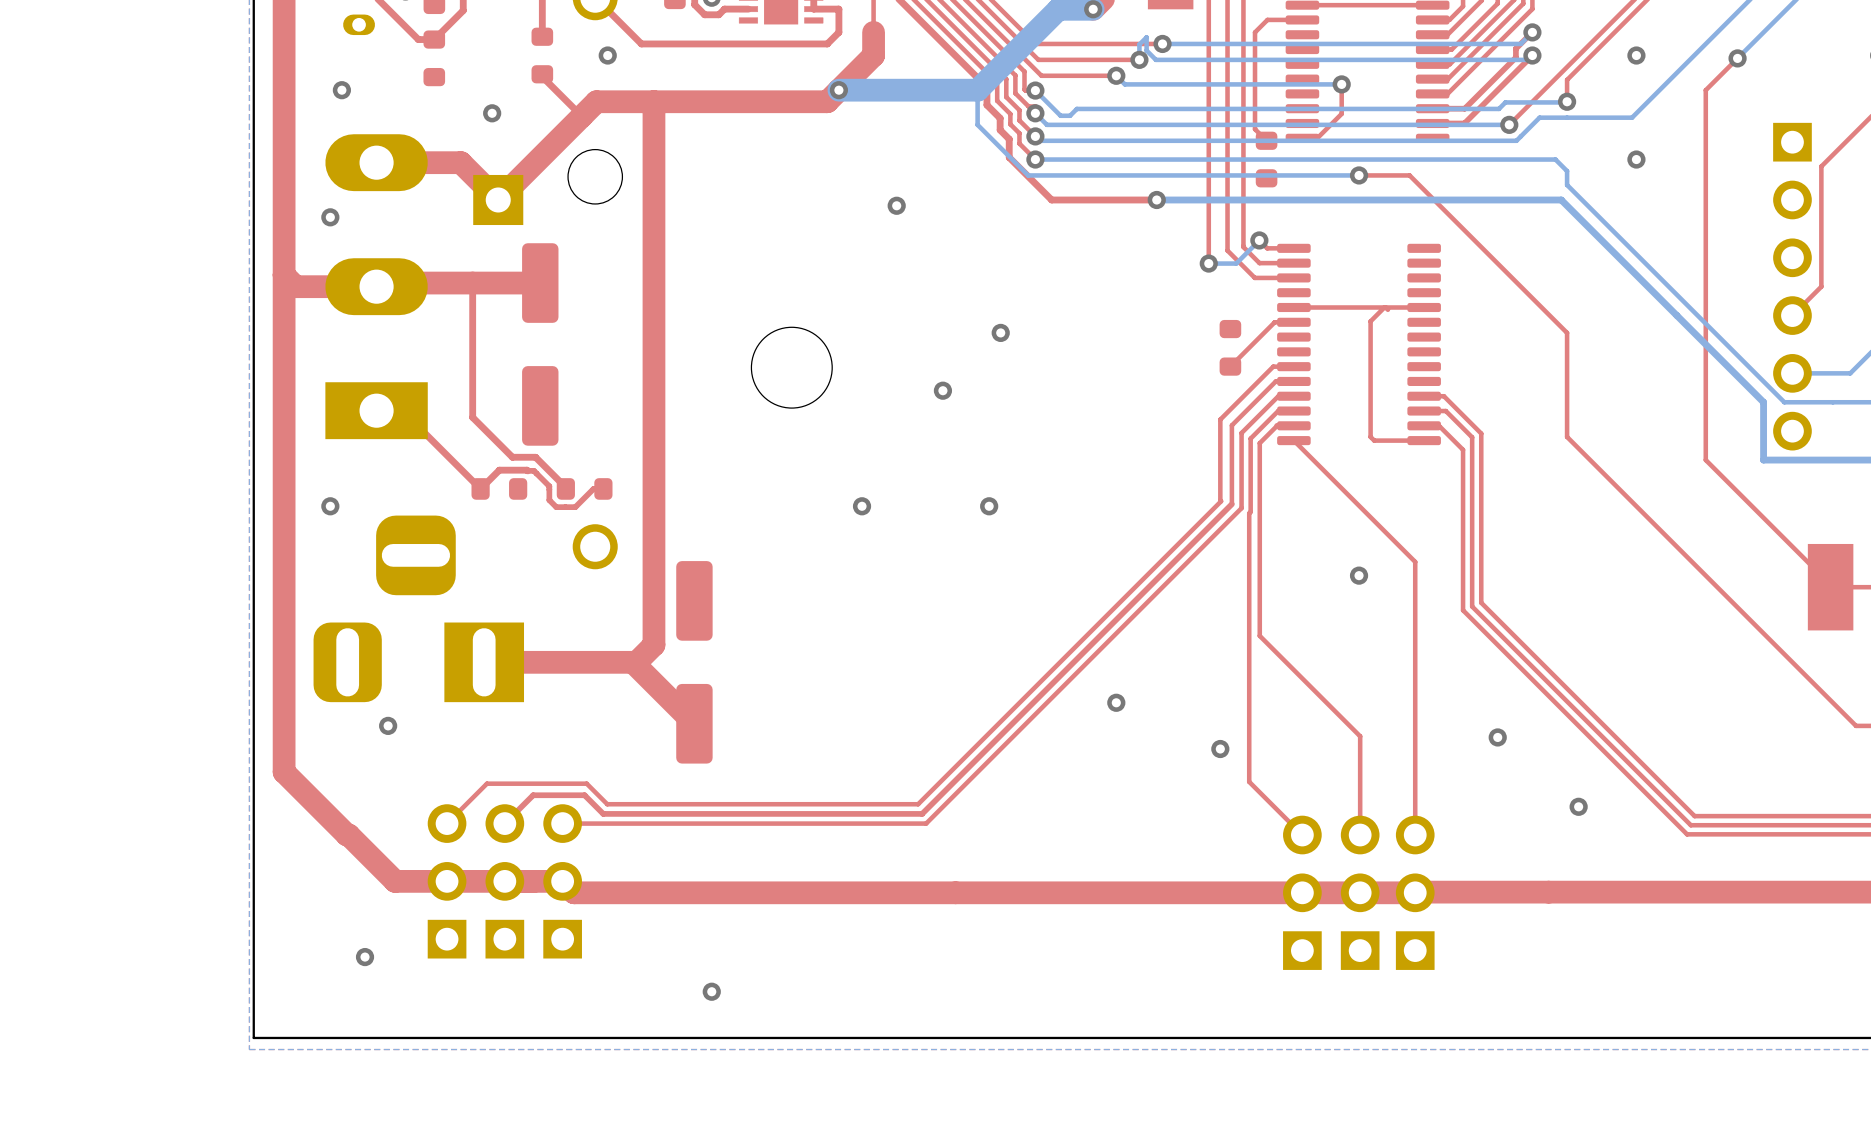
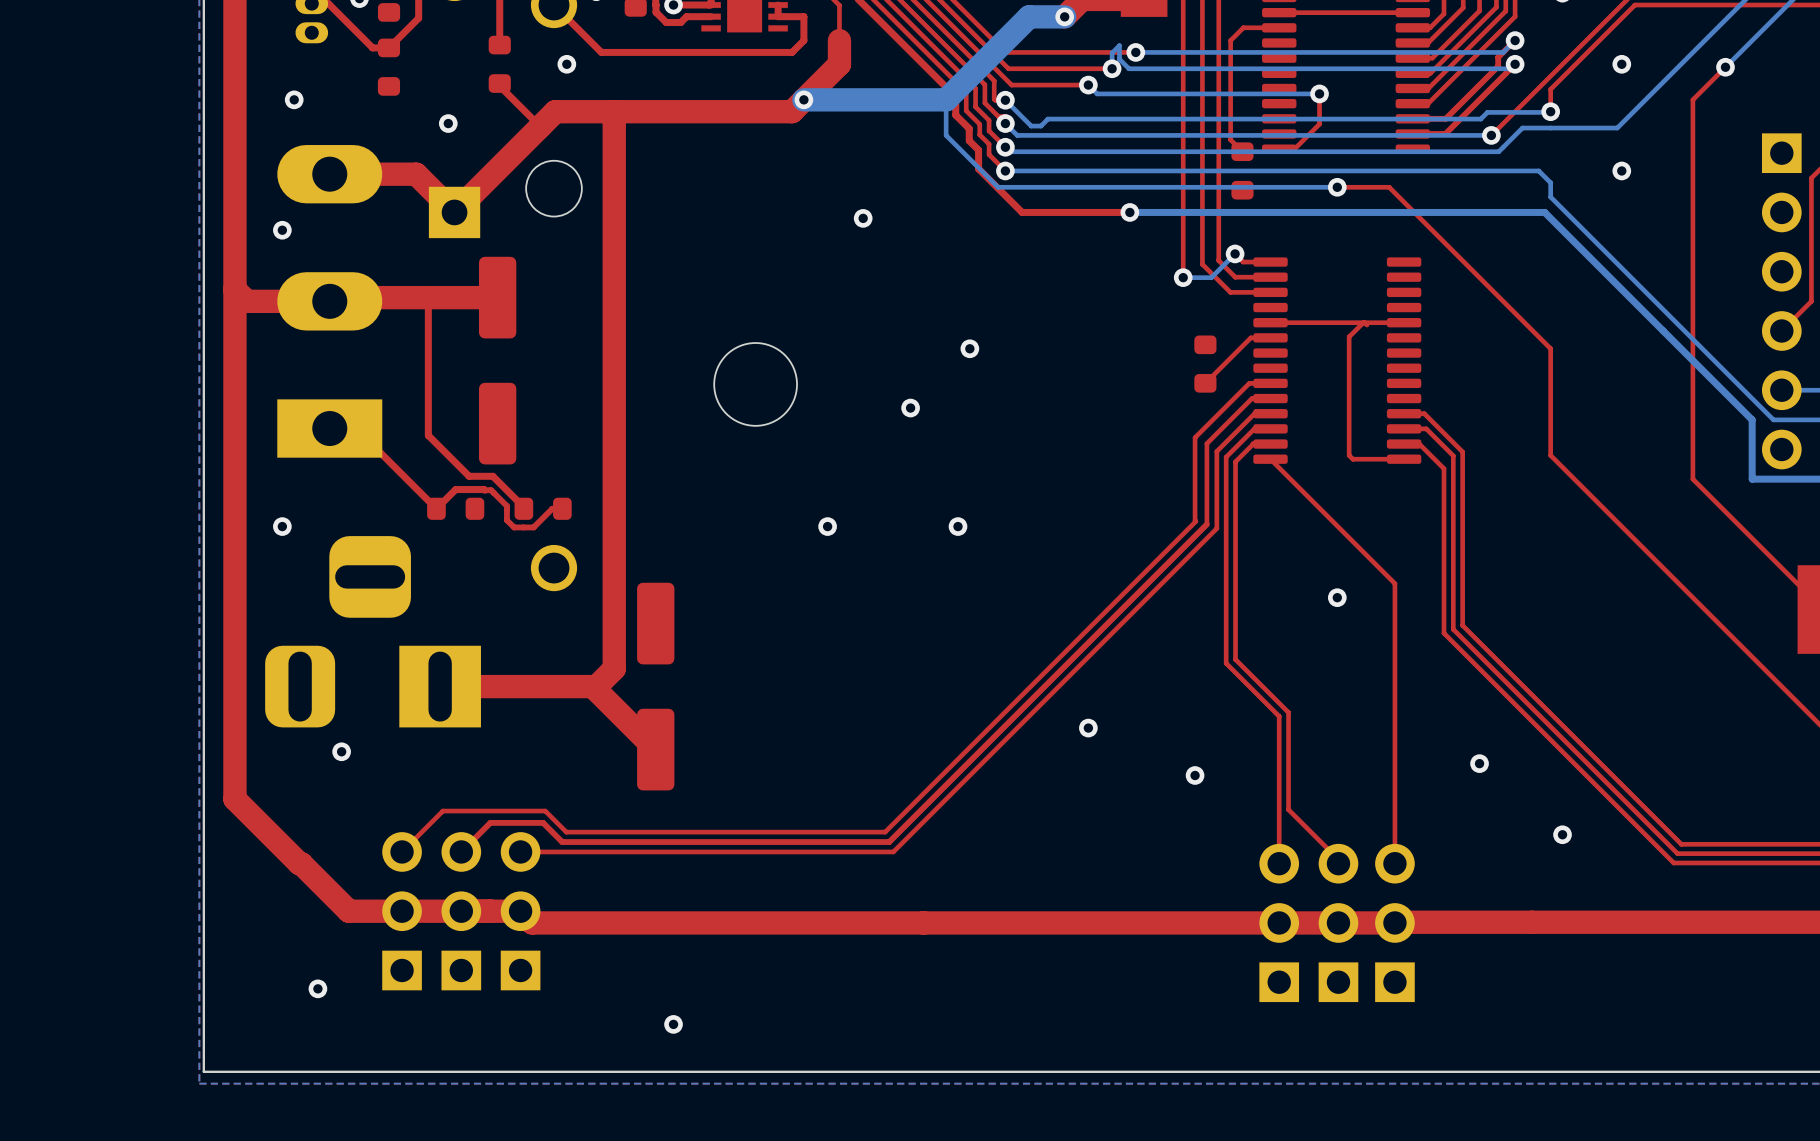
top track: (1250, 511) (1249, 781) (1302, 835) -> (1226, 532) (1226, 663) (1279, 716) (1279, 863)
top track: (1311, 687) (1360, 736) (1360, 831) -> (1288, 712) (1288, 809) (1338, 859)

